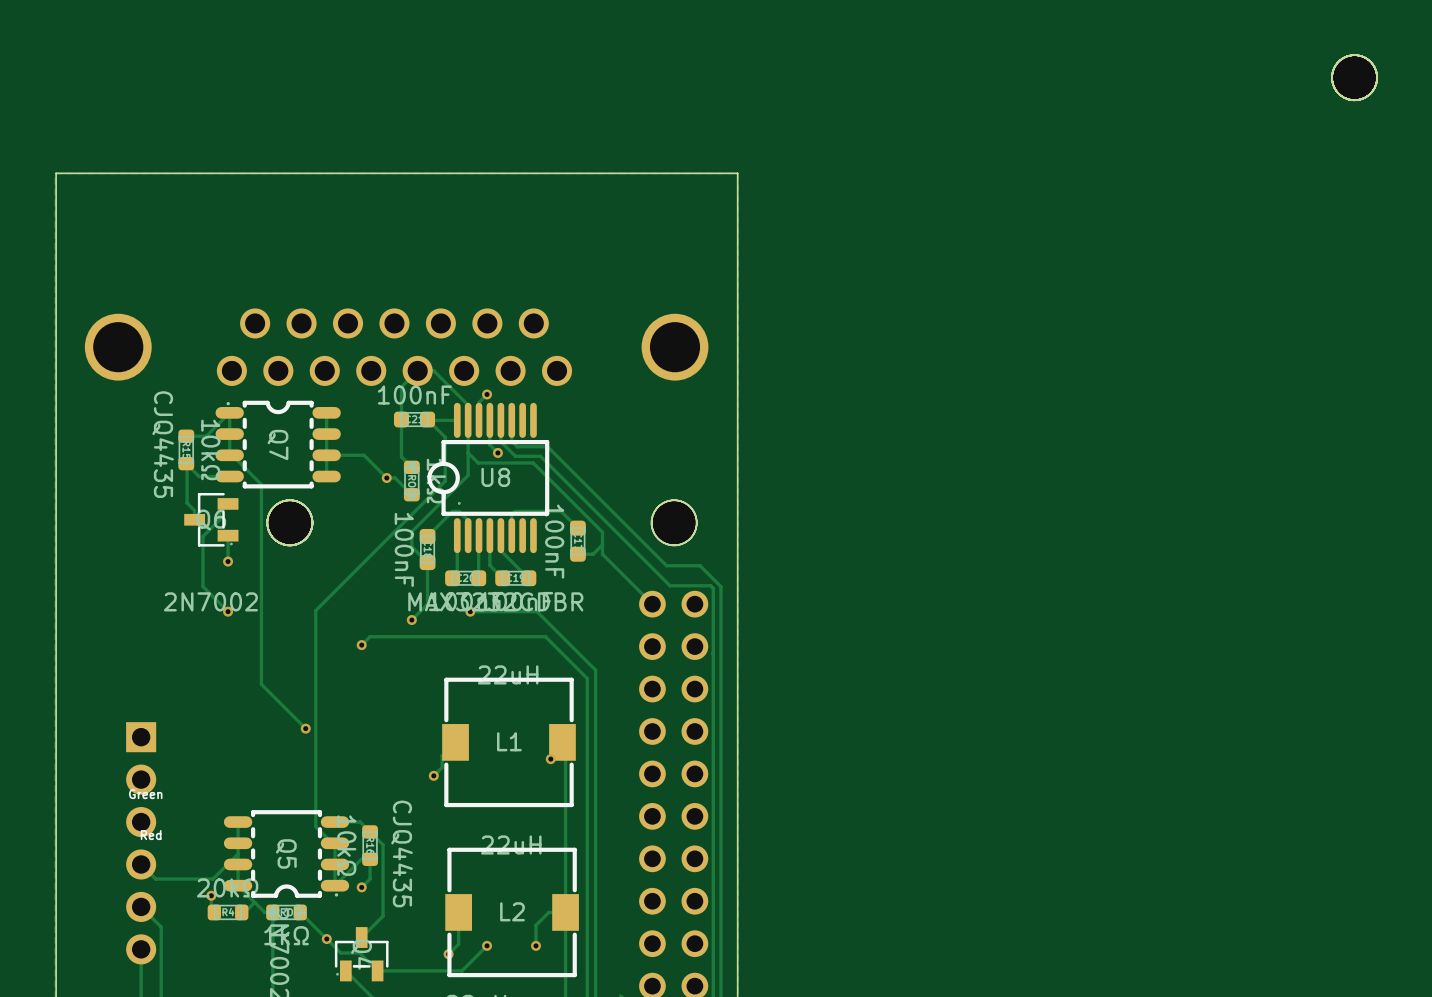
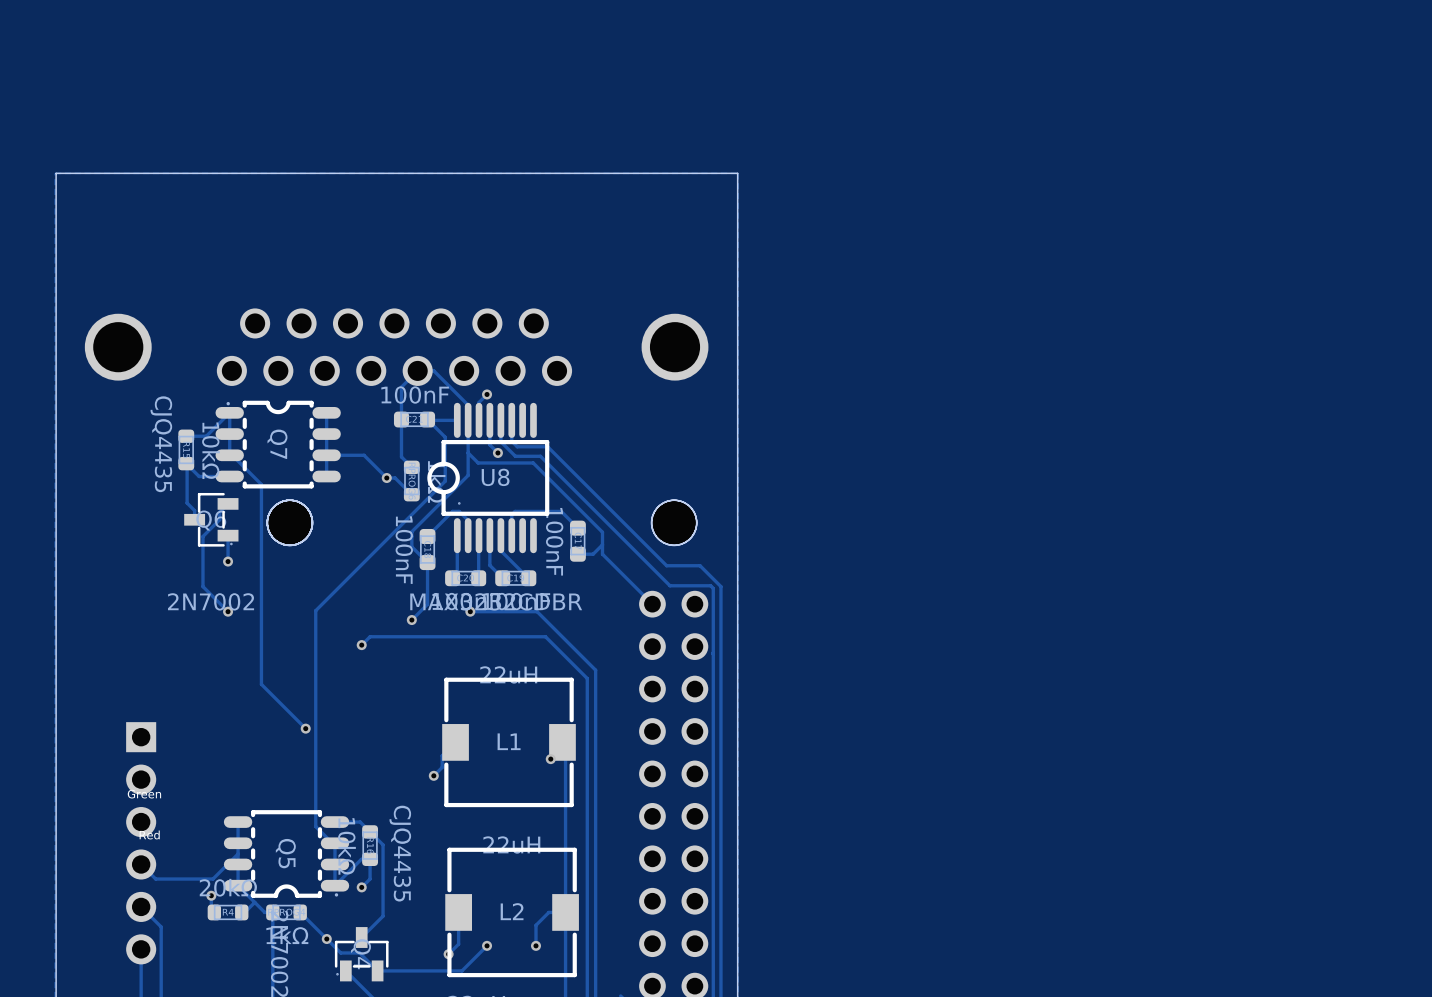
part: (1354, 77) -> none

